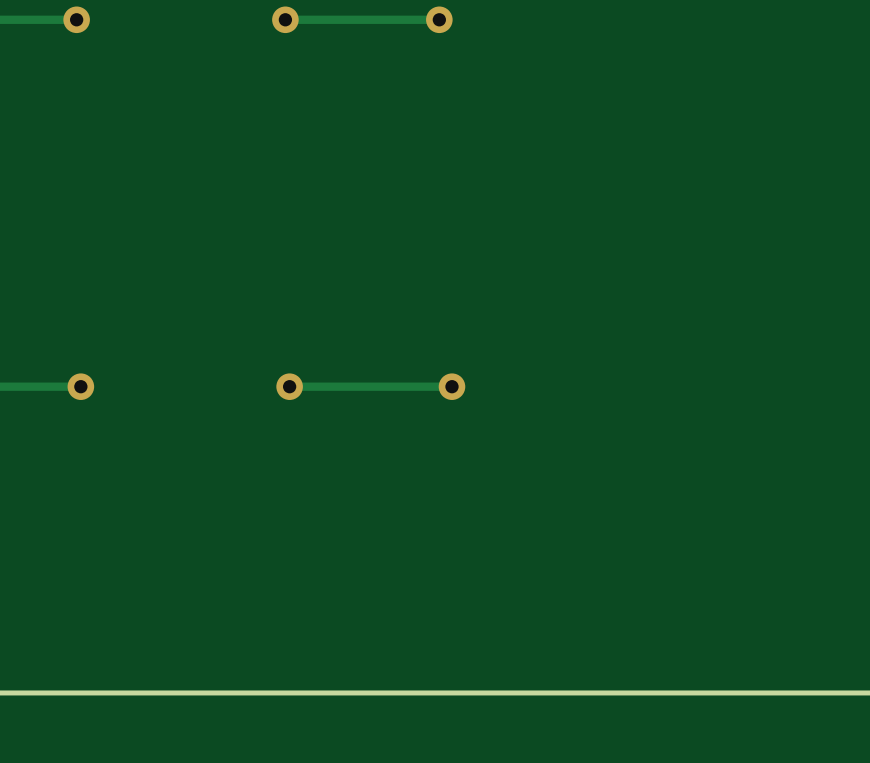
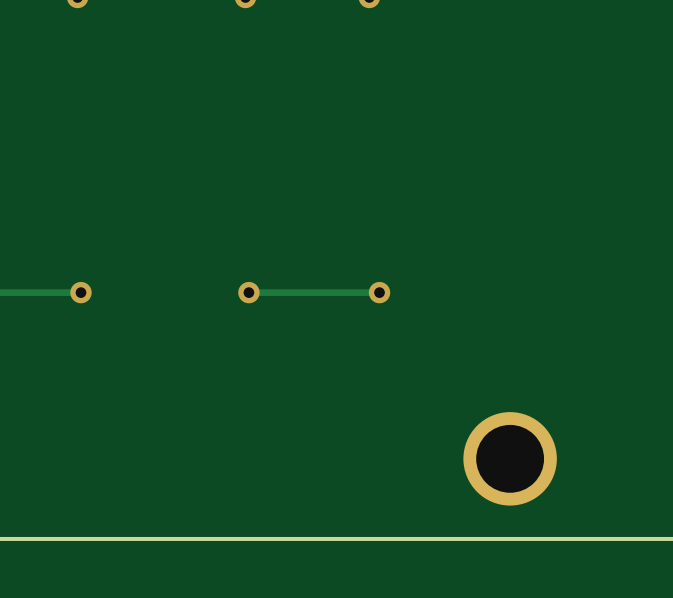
part: none -> (510, 458)

